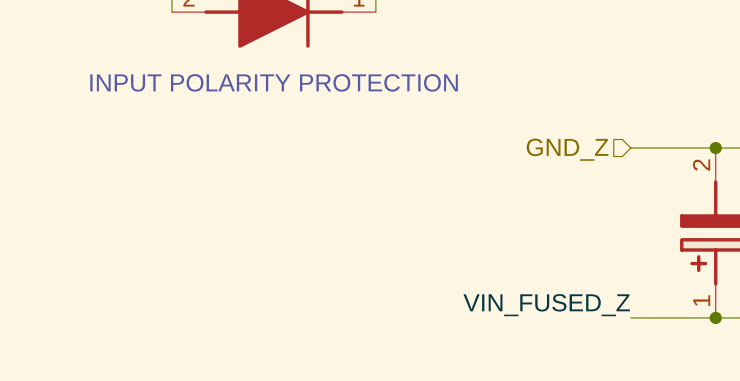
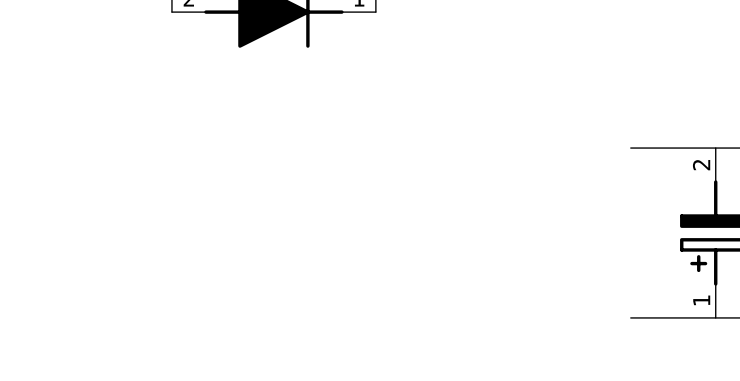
text: INPUT POLARITY PROTECTION (274, 82) -> none
junction: (715, 148) -> none
hierarchical label: GND_Z (567, 149) -> none
label: VIN_FUSED_Z (546, 305) -> none
junction: (715, 317) -> none

